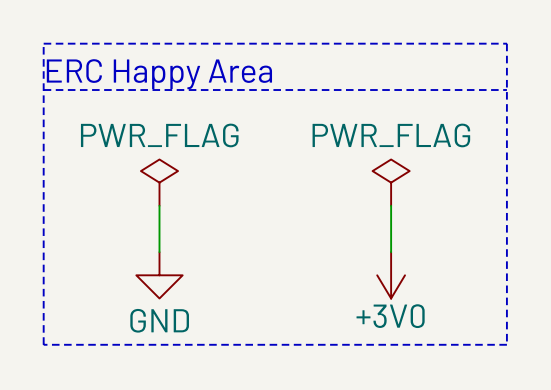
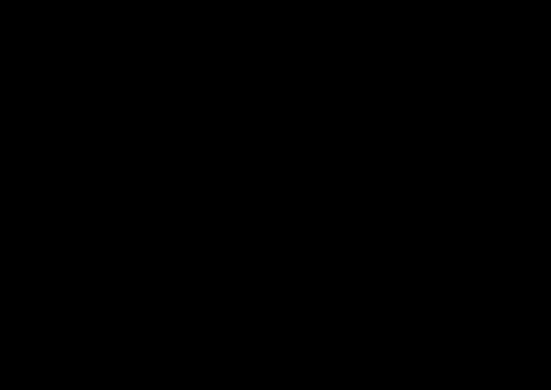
line: (43, 43) (43, 344) (506, 344) (506, 43) (43, 43) -> none
text: ERC Happy Area (159, 74) -> none
line: (43, 90) (506, 90) -> none
power symbol: PWR_FLAG (159, 182) -> none
power symbol: PWR_FLAG (391, 182) -> none
wire: (159, 205) (159, 252) -> none
wire: (391, 205) (391, 252) -> none
power symbol: GND (159, 275) -> none
power symbol: +3V0 (391, 275) -> none

